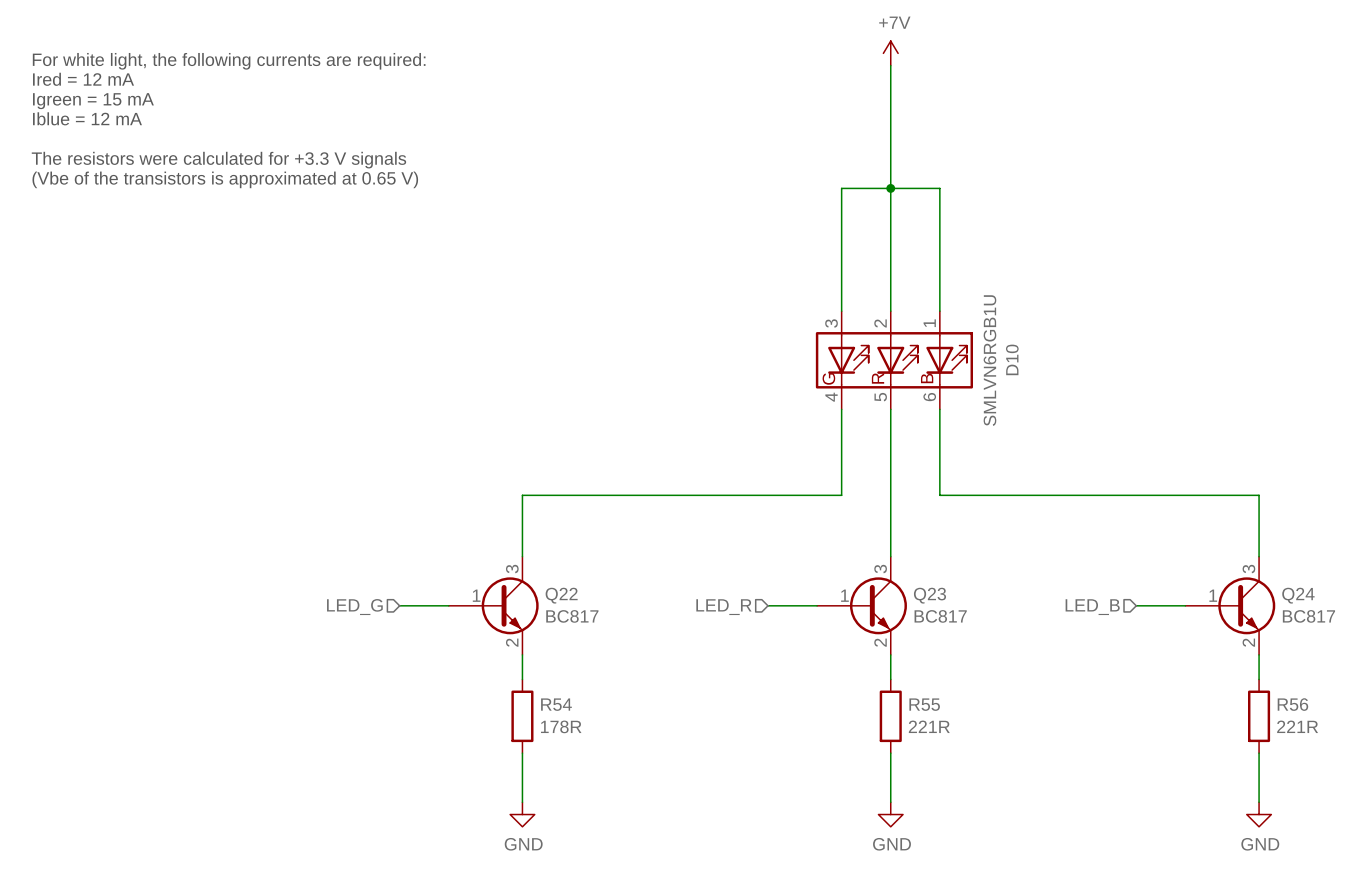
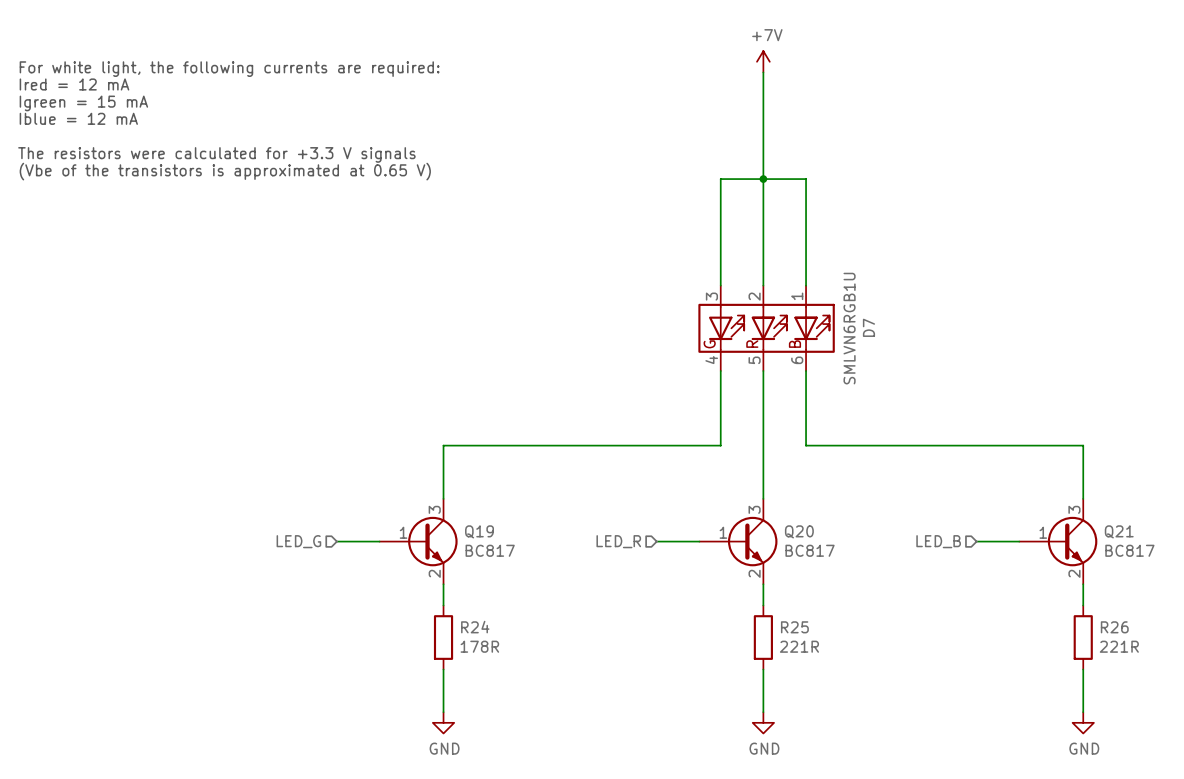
D10 name: D10 (1012, 359) -> D7 (868, 327)
Q22 name: Q22 (561, 595) -> Q19 (479, 531)
Q23 name: Q23 (929, 595) -> Q20 (799, 531)
Q24 name: Q24 (1298, 595) -> Q21 (1119, 531)
R54 name: R54 (556, 704) -> R24 (475, 627)
R55 name: R55 (924, 704) -> R25 (794, 627)
R56 name: R56 (1292, 704) -> R26 (1114, 627)

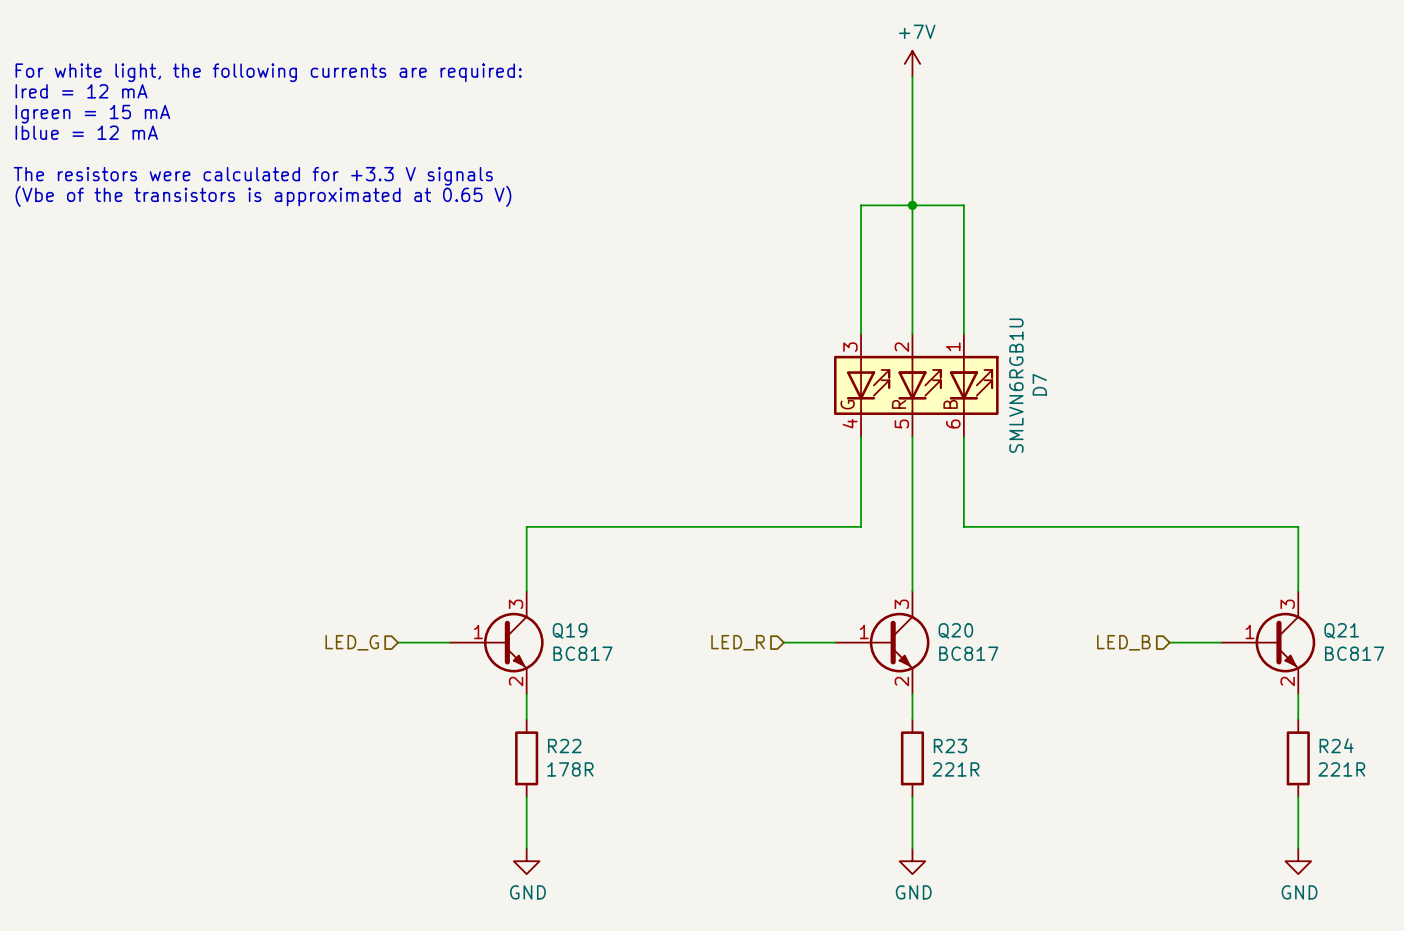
R24 name: R24 (475, 627) -> R22 (564, 746)
R25 name: R25 (794, 627) -> R23 (950, 746)
R26 name: R26 (1114, 627) -> R24 (1336, 745)

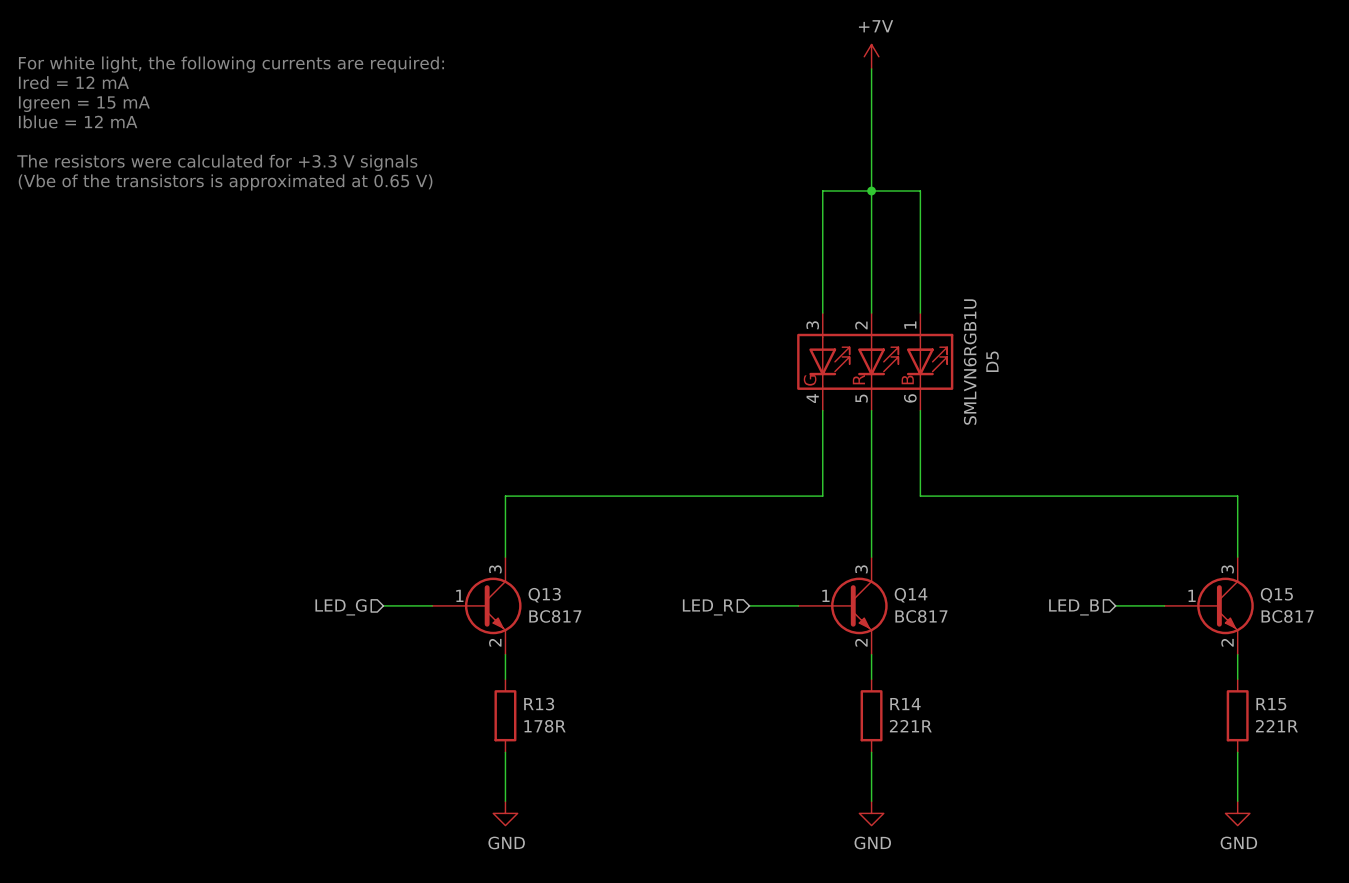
D7 name: D7 (1039, 384) -> D5 (992, 361)
Q19 name: Q19 (570, 630) -> Q13 (544, 595)
Q20 name: Q20 (955, 630) -> Q14 (911, 595)
Q21 name: Q21 (1341, 630) -> Q15 (1276, 595)
R24 name: R24 (1336, 745) -> R15 (1271, 704)
R22 name: R22 (564, 746) -> R13 (539, 704)
R23 name: R23 (950, 746) -> R14 (905, 704)

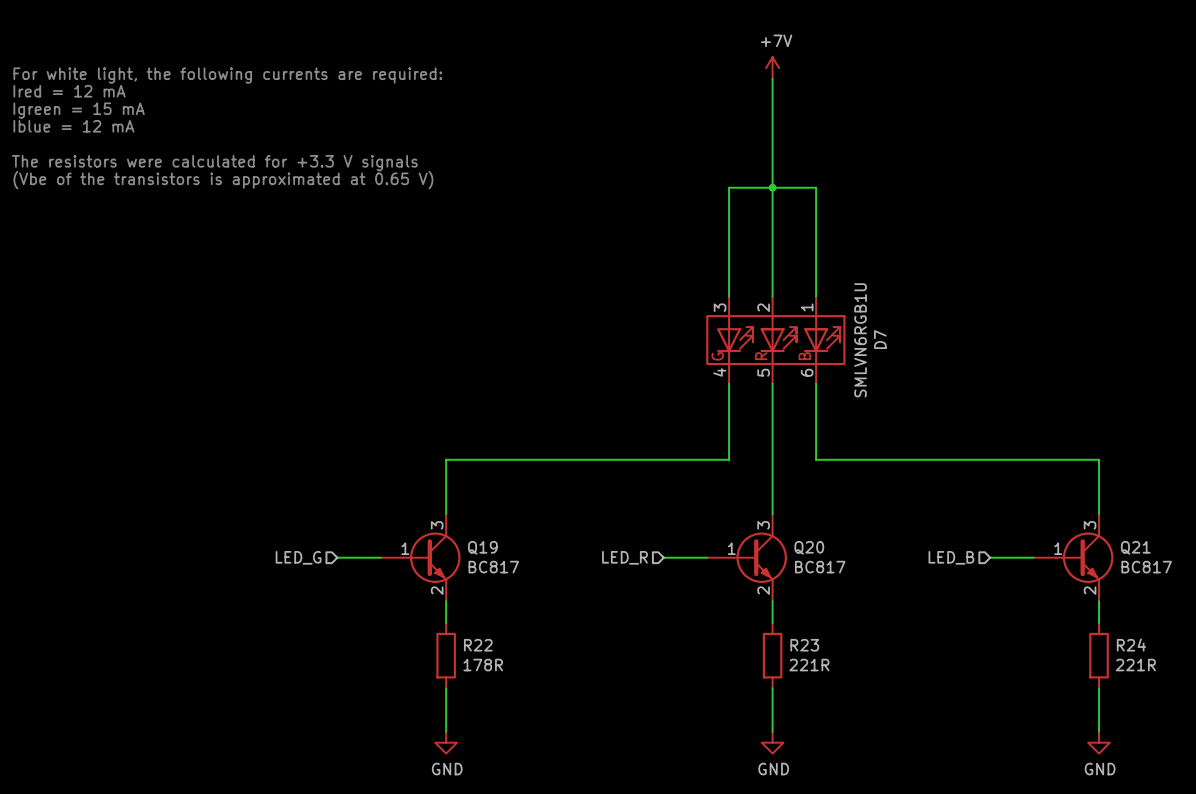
D5 name: D5 (992, 361) -> D7 (880, 339)
Q13 name: Q13 (544, 595) -> Q19 (482, 547)
Q14 name: Q14 (911, 595) -> Q20 (809, 547)
Q15 name: Q15 (1276, 595) -> Q21 (1135, 547)
R13 name: R13 (539, 704) -> R22 (478, 645)
R14 name: R14 (905, 704) -> R23 (804, 645)
R15 name: R15 (1271, 704) -> R24 (1131, 644)

